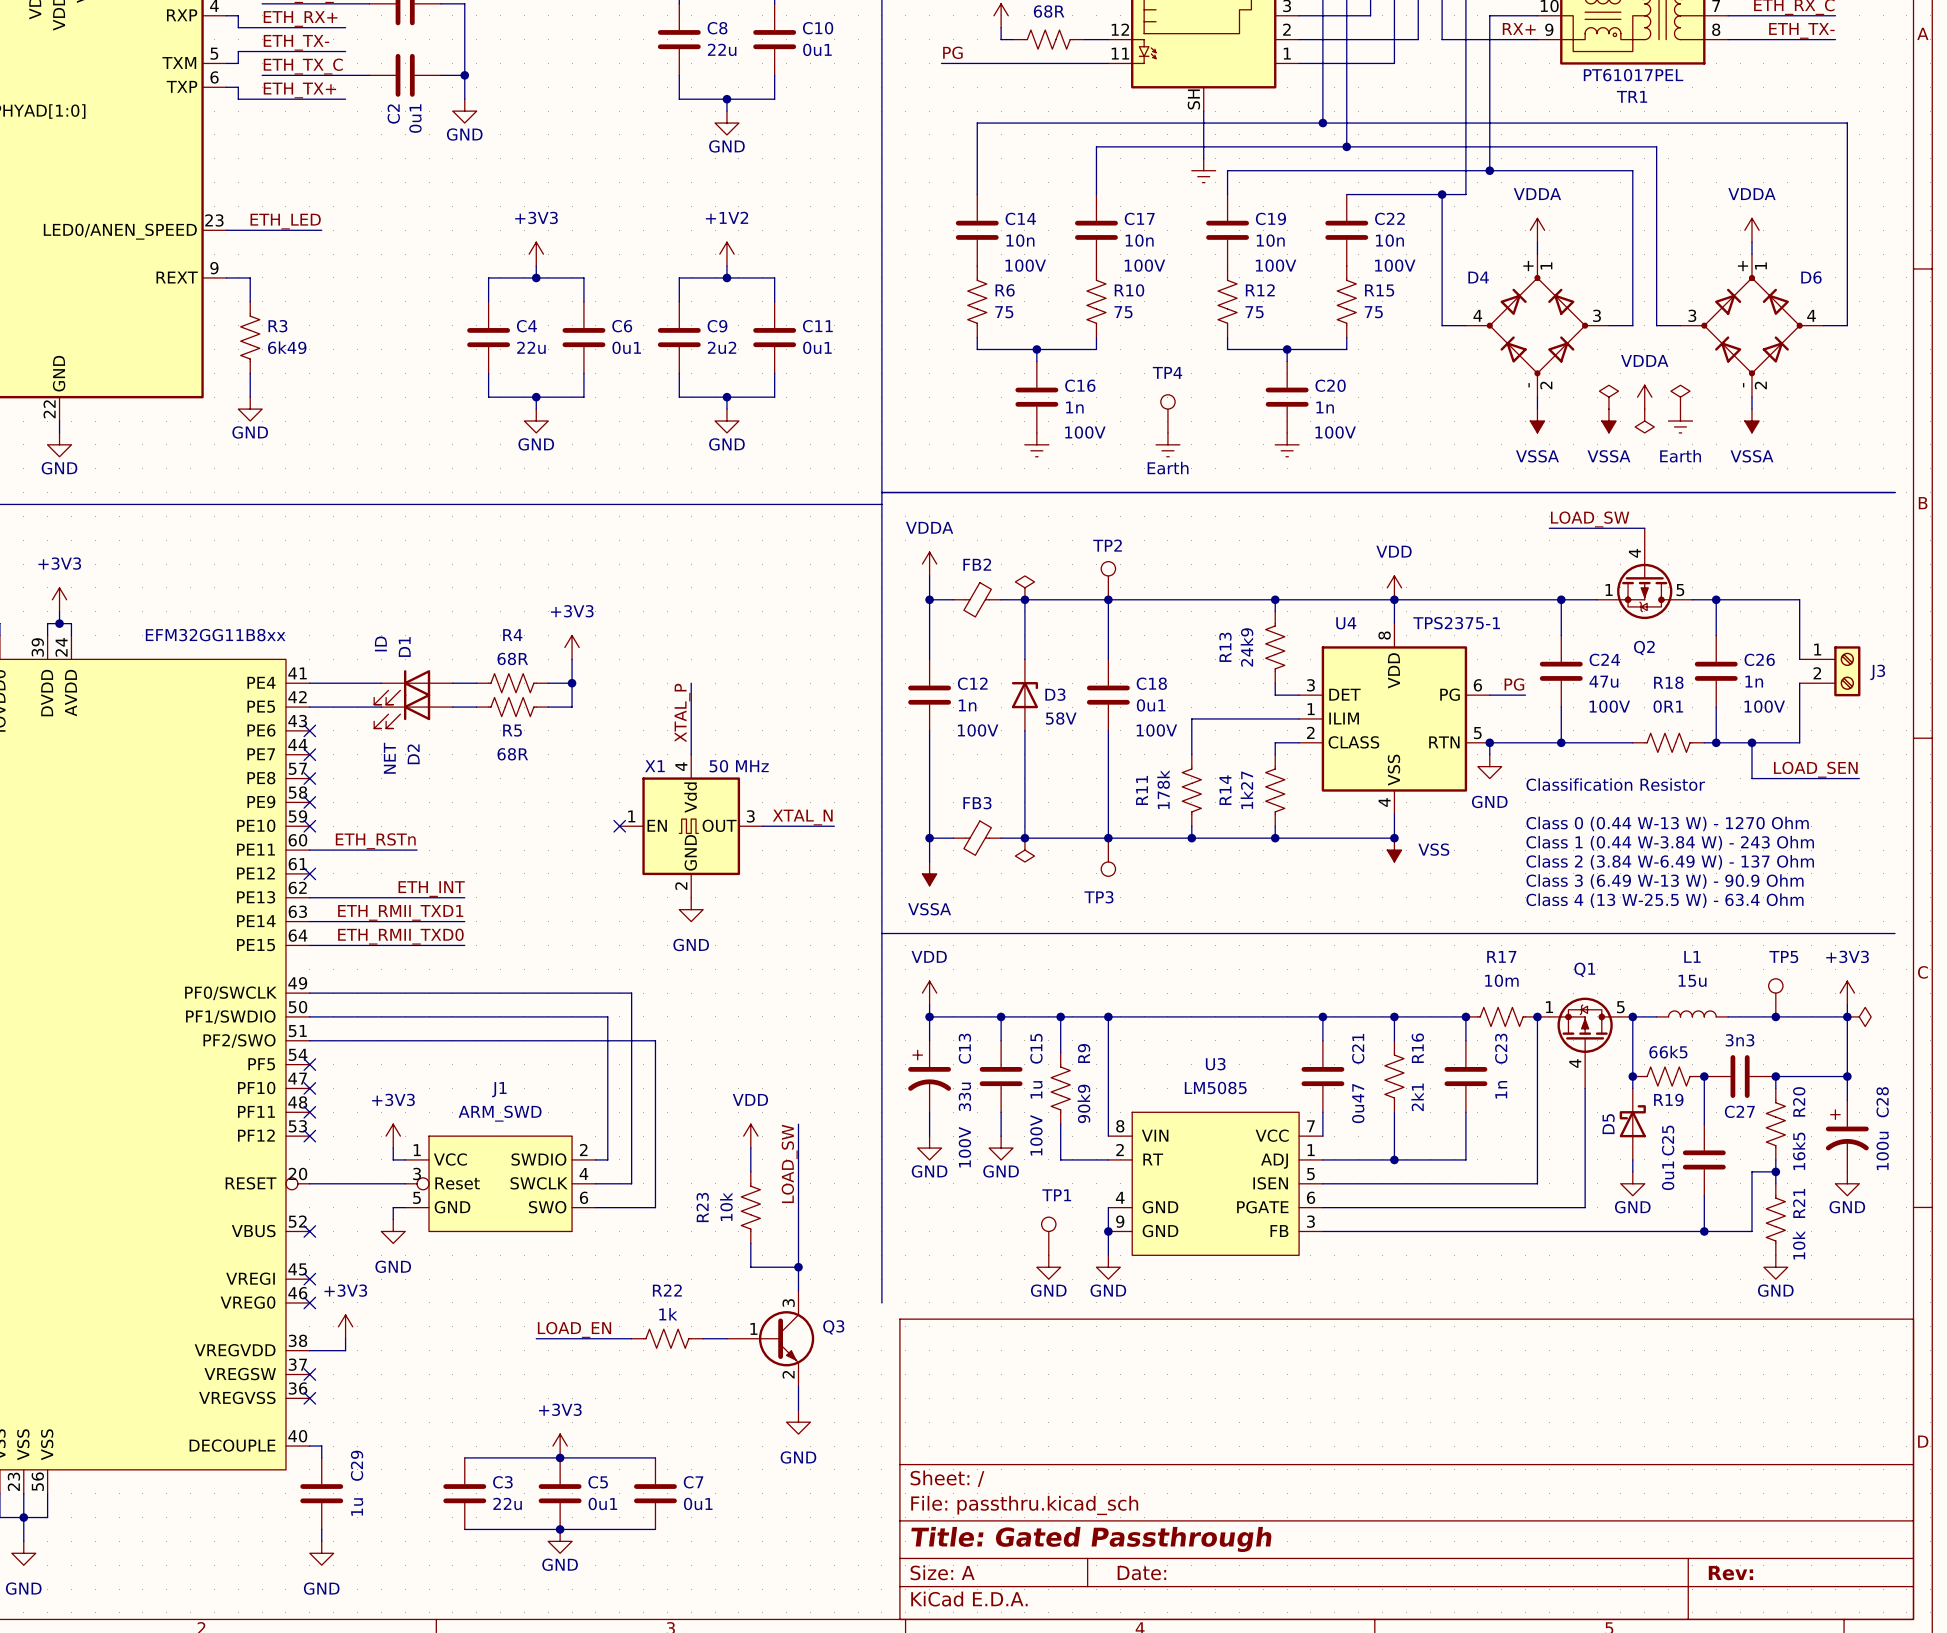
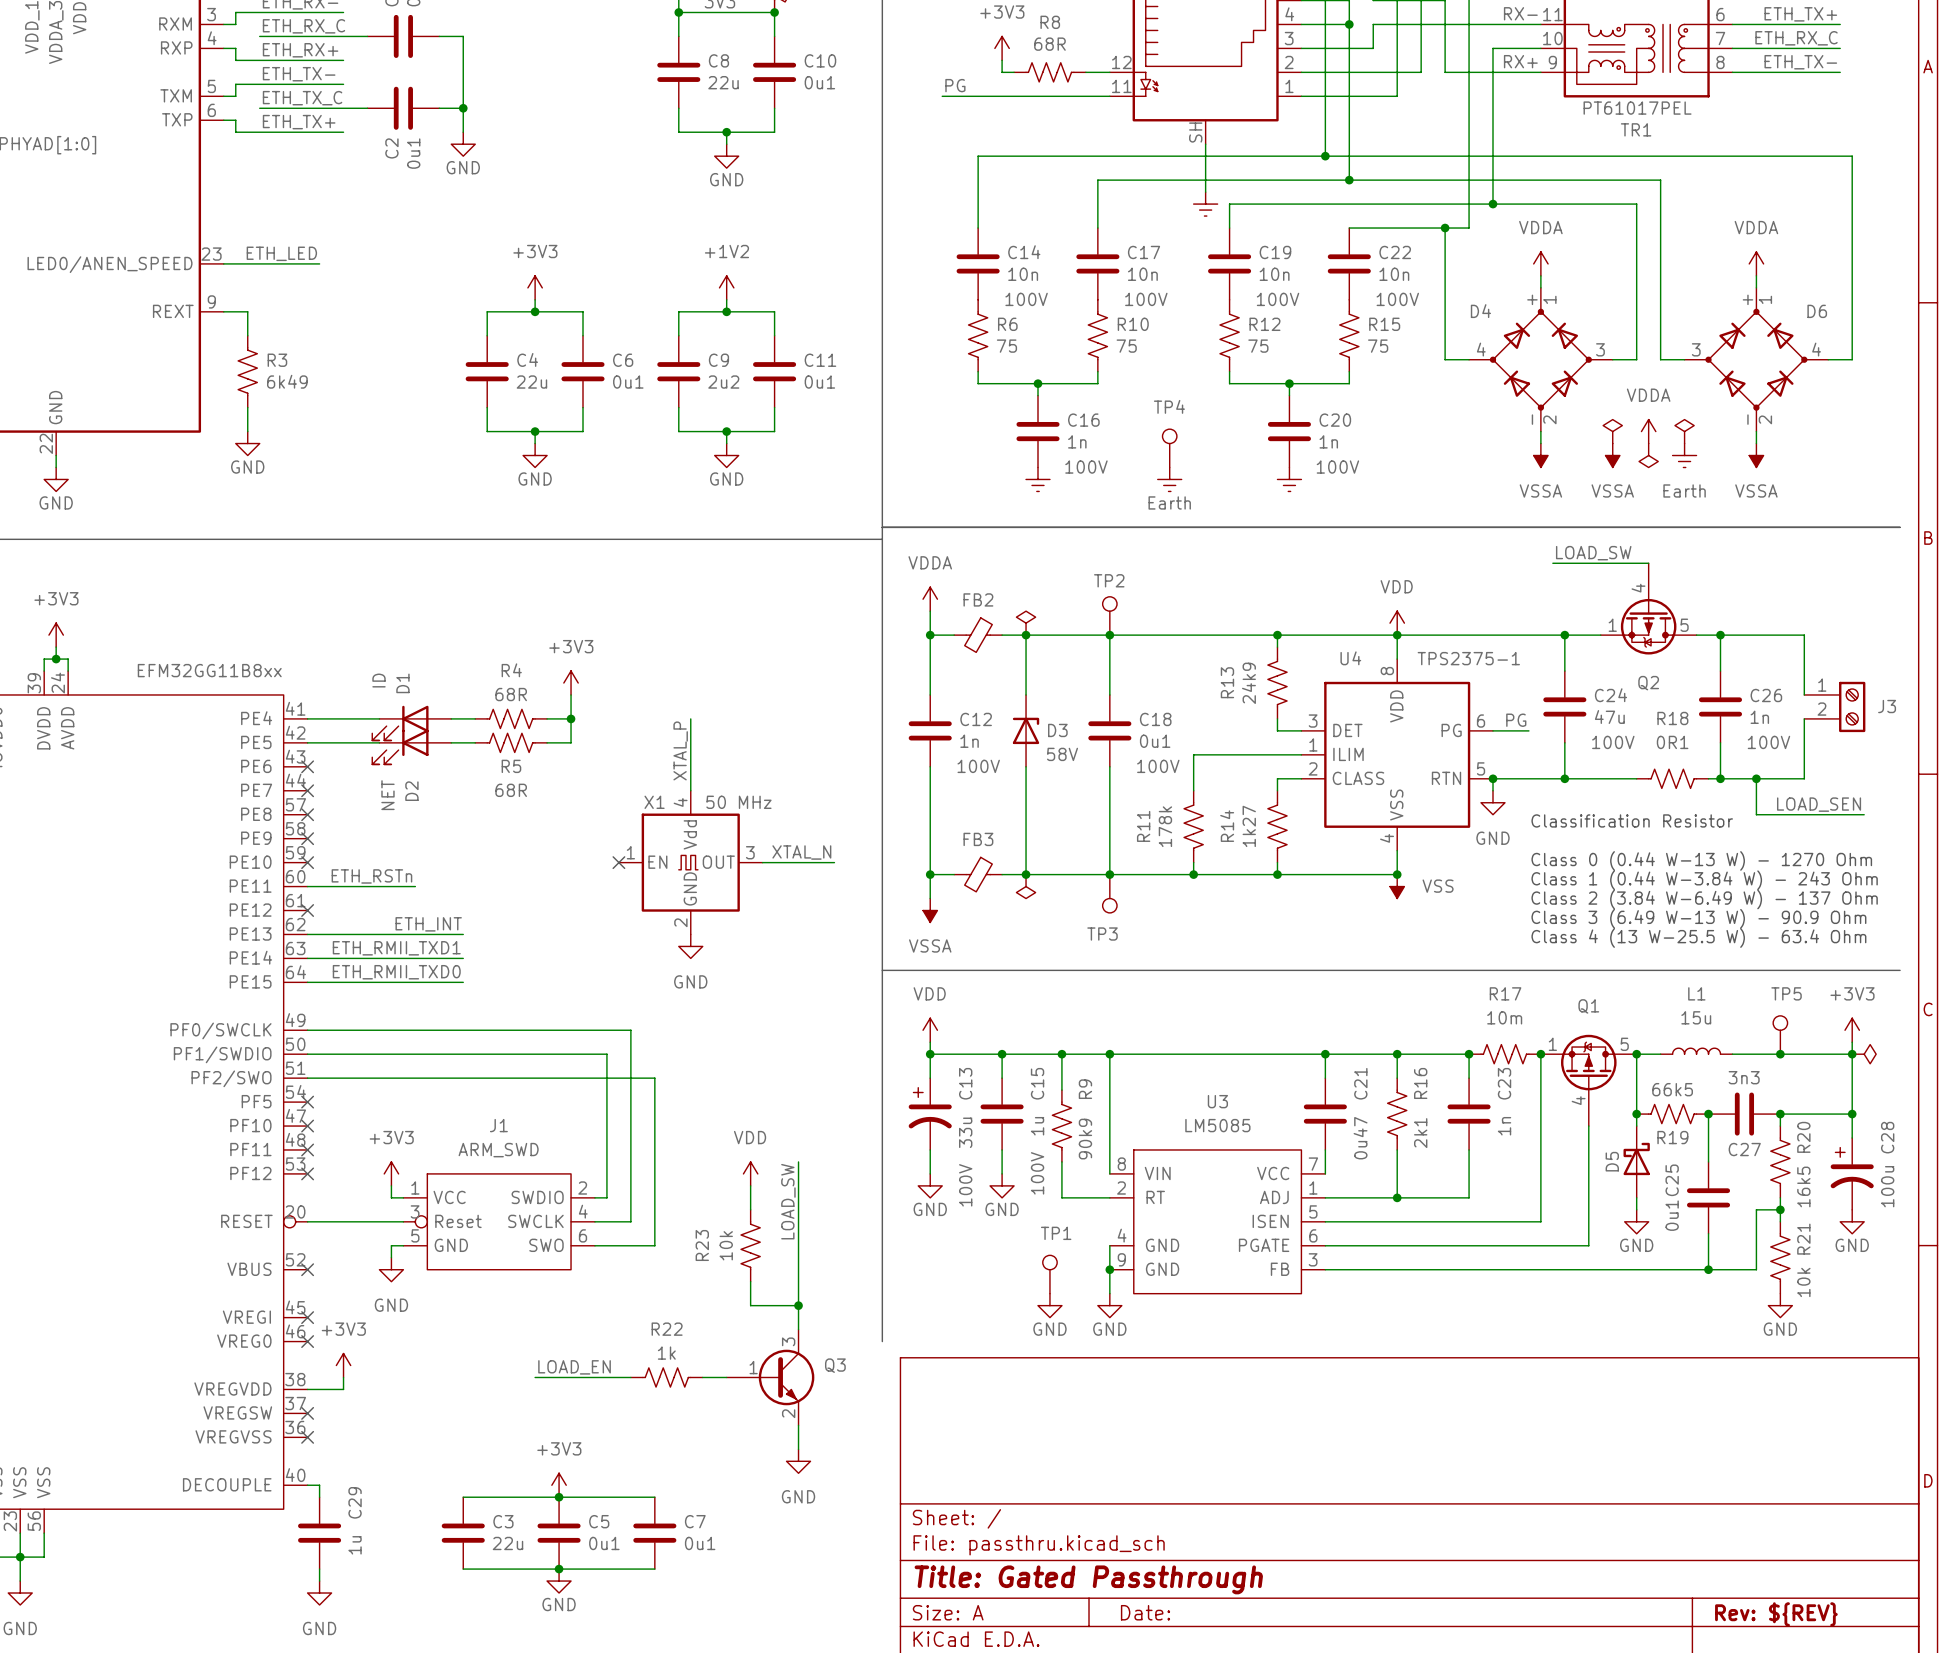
title block: Rev: (1730, 1573) -> Rev: ${REV} (1776, 1614)

